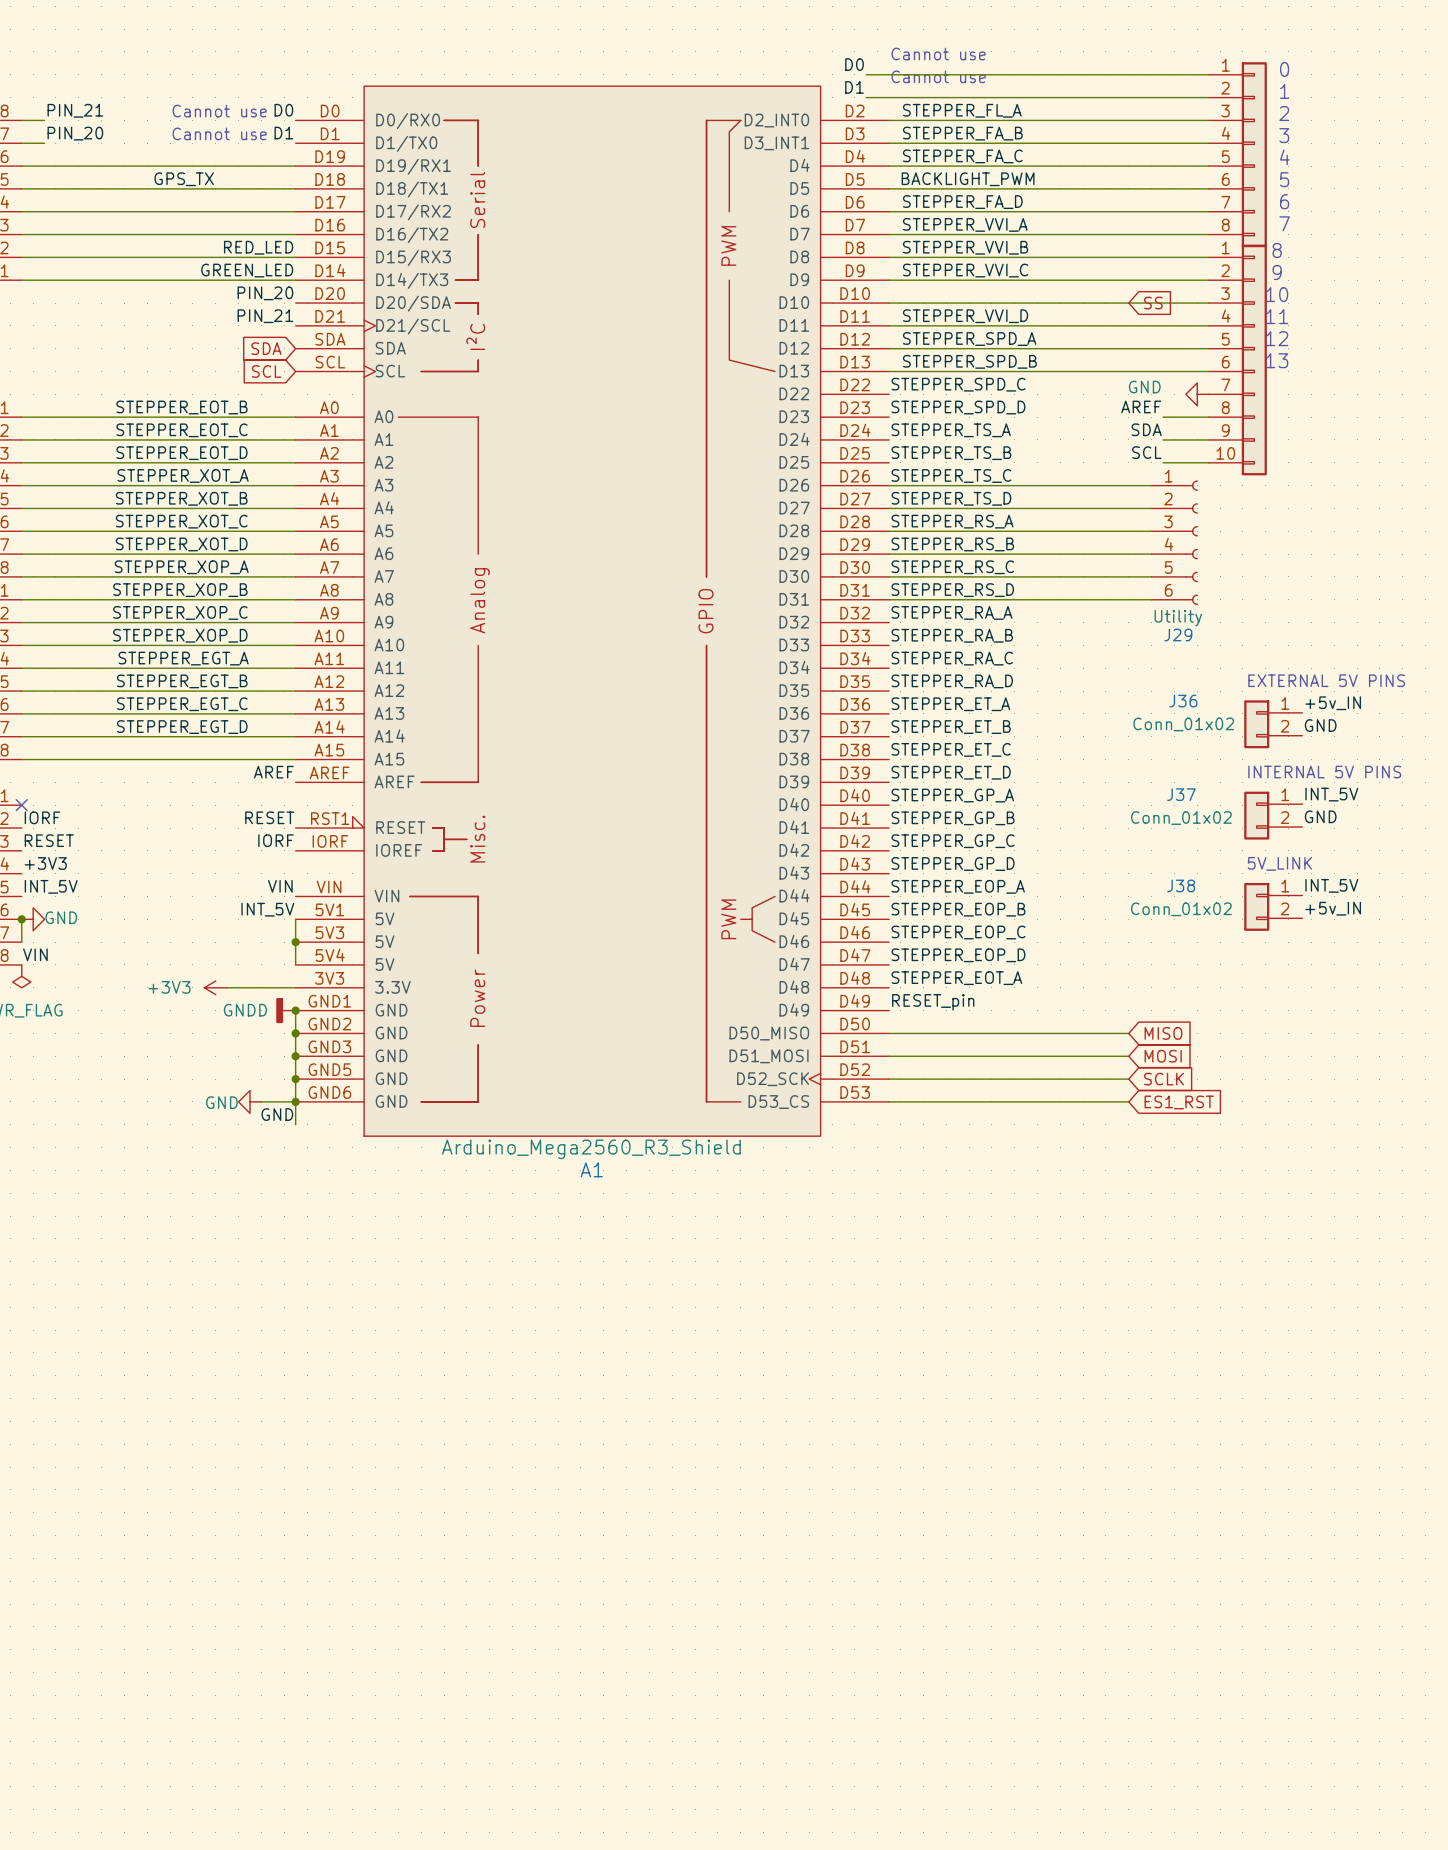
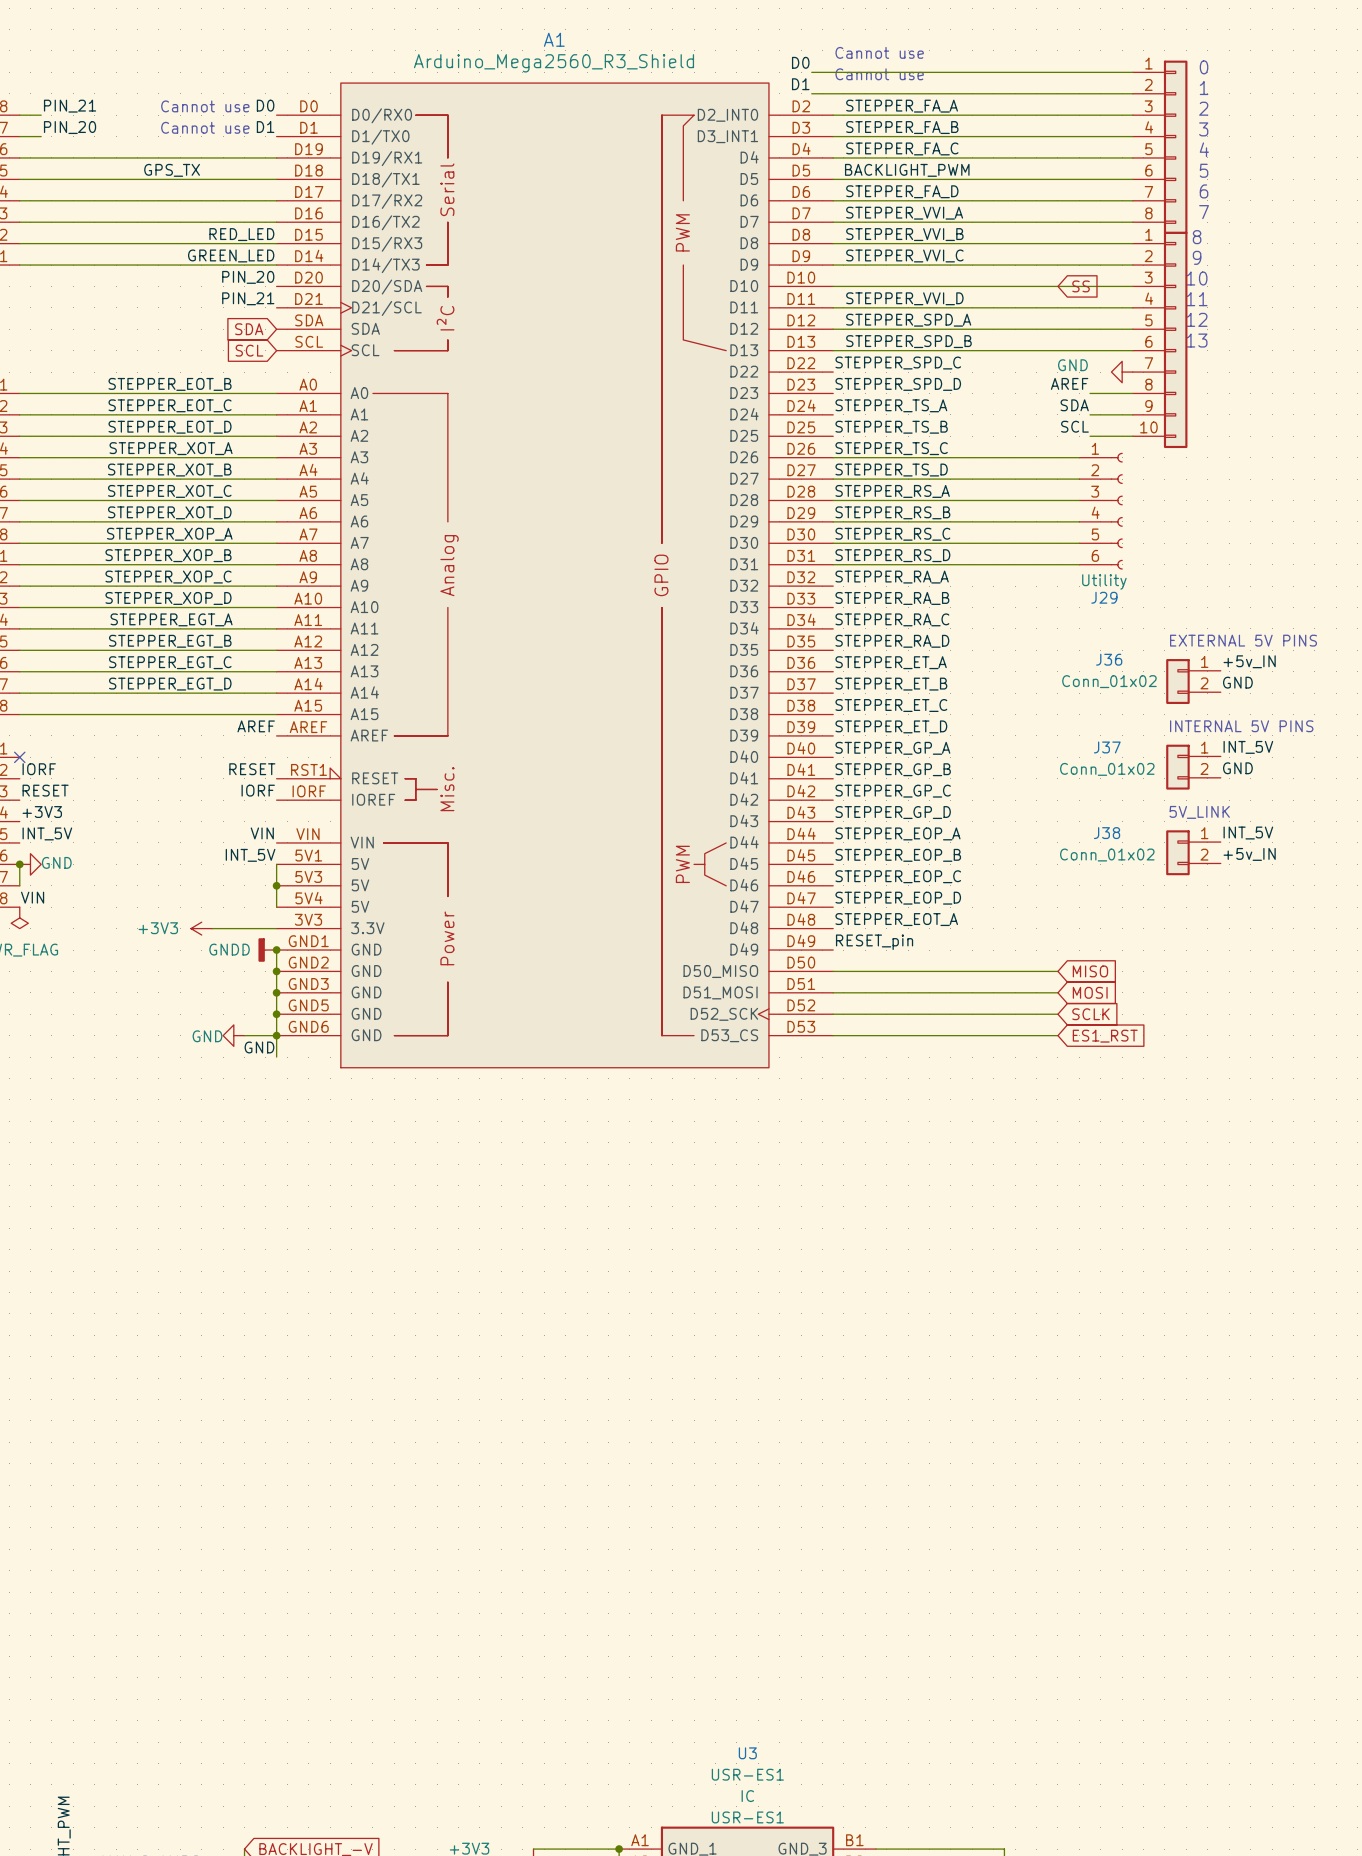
label: STEPPER_FL_A (962, 110) -> STEPPER_FA_A (902, 106)
A1 value position: Arduino_Mega2560_R3_Shield (591, 1149) -> Arduino_Mega2560_R3_Shield (553, 63)
A1 name position: A1 (591, 1169) -> A1 (554, 39)

